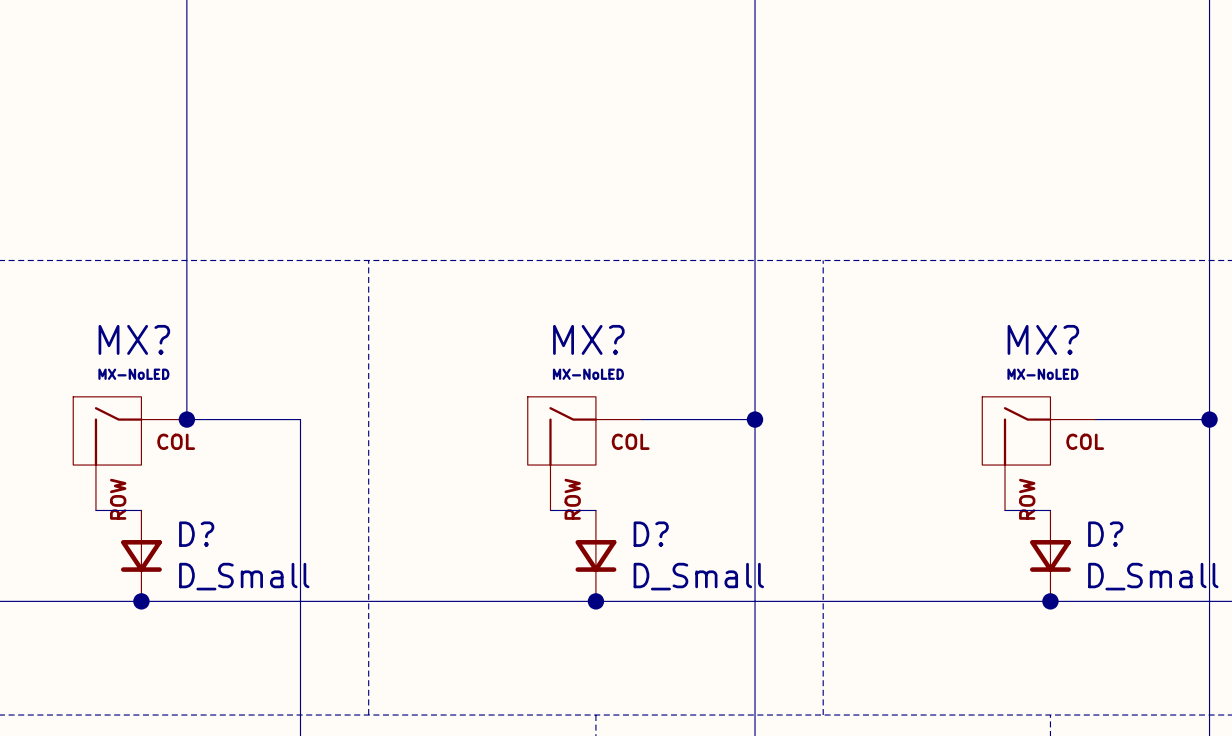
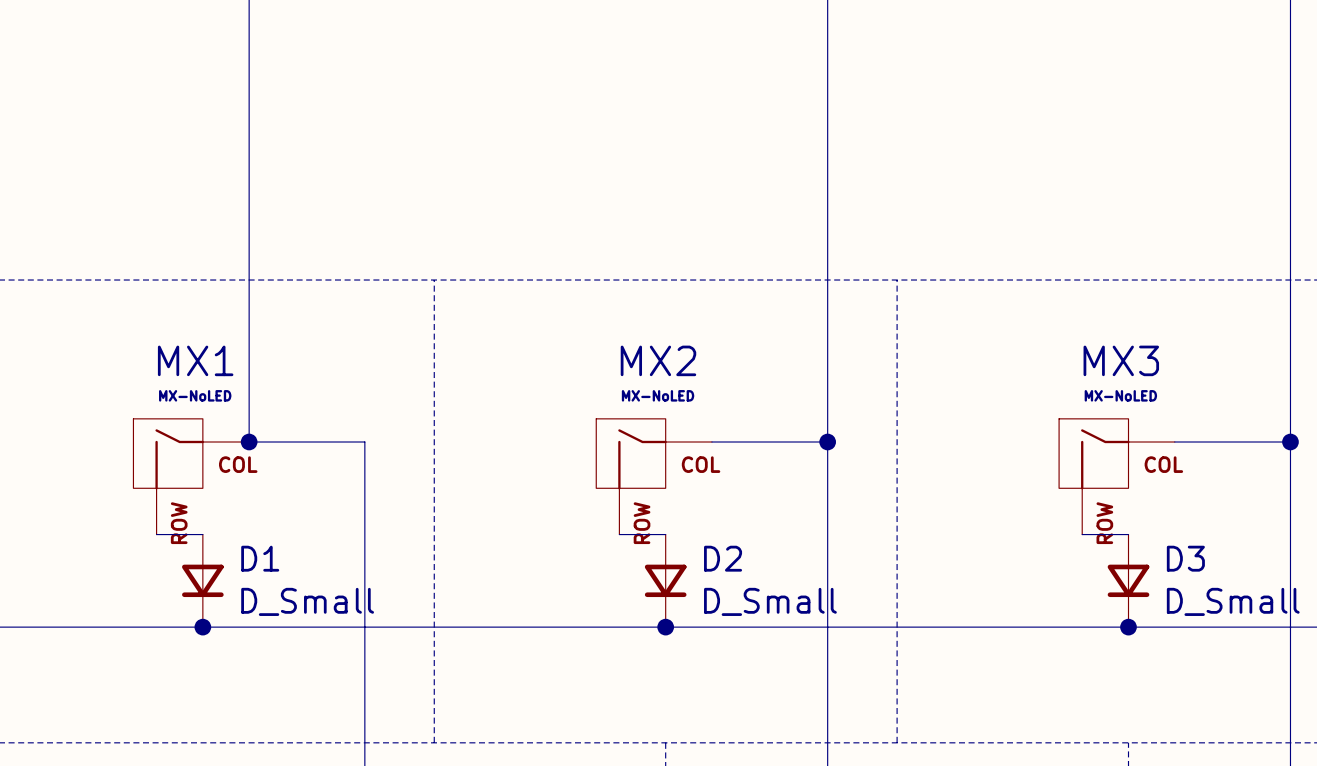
MX? name: MX? (134, 339) -> MX1 (195, 360)
MX? name: MX? (588, 339) -> MX2 (658, 360)
MX? name: MX? (1043, 339) -> MX3 (1121, 360)
D? name: D? (196, 534) -> D1 (260, 558)
D? name: D? (651, 534) -> D2 (723, 558)
D? name: D? (1105, 534) -> D3 (1185, 558)

